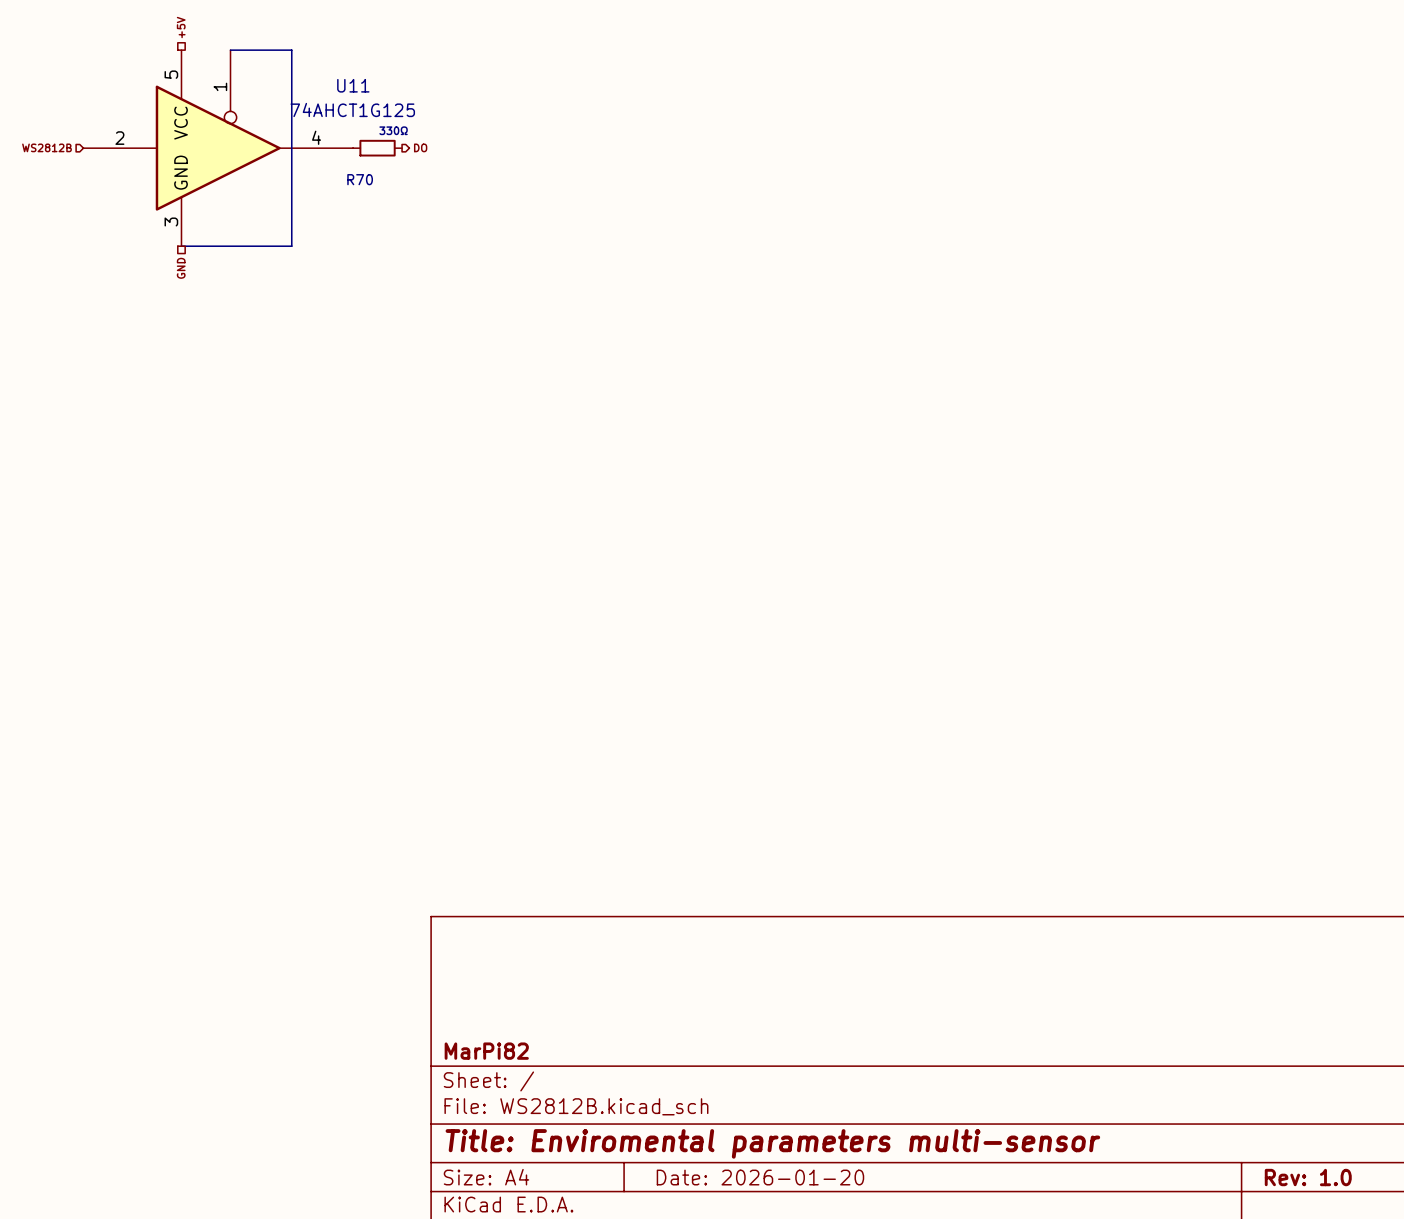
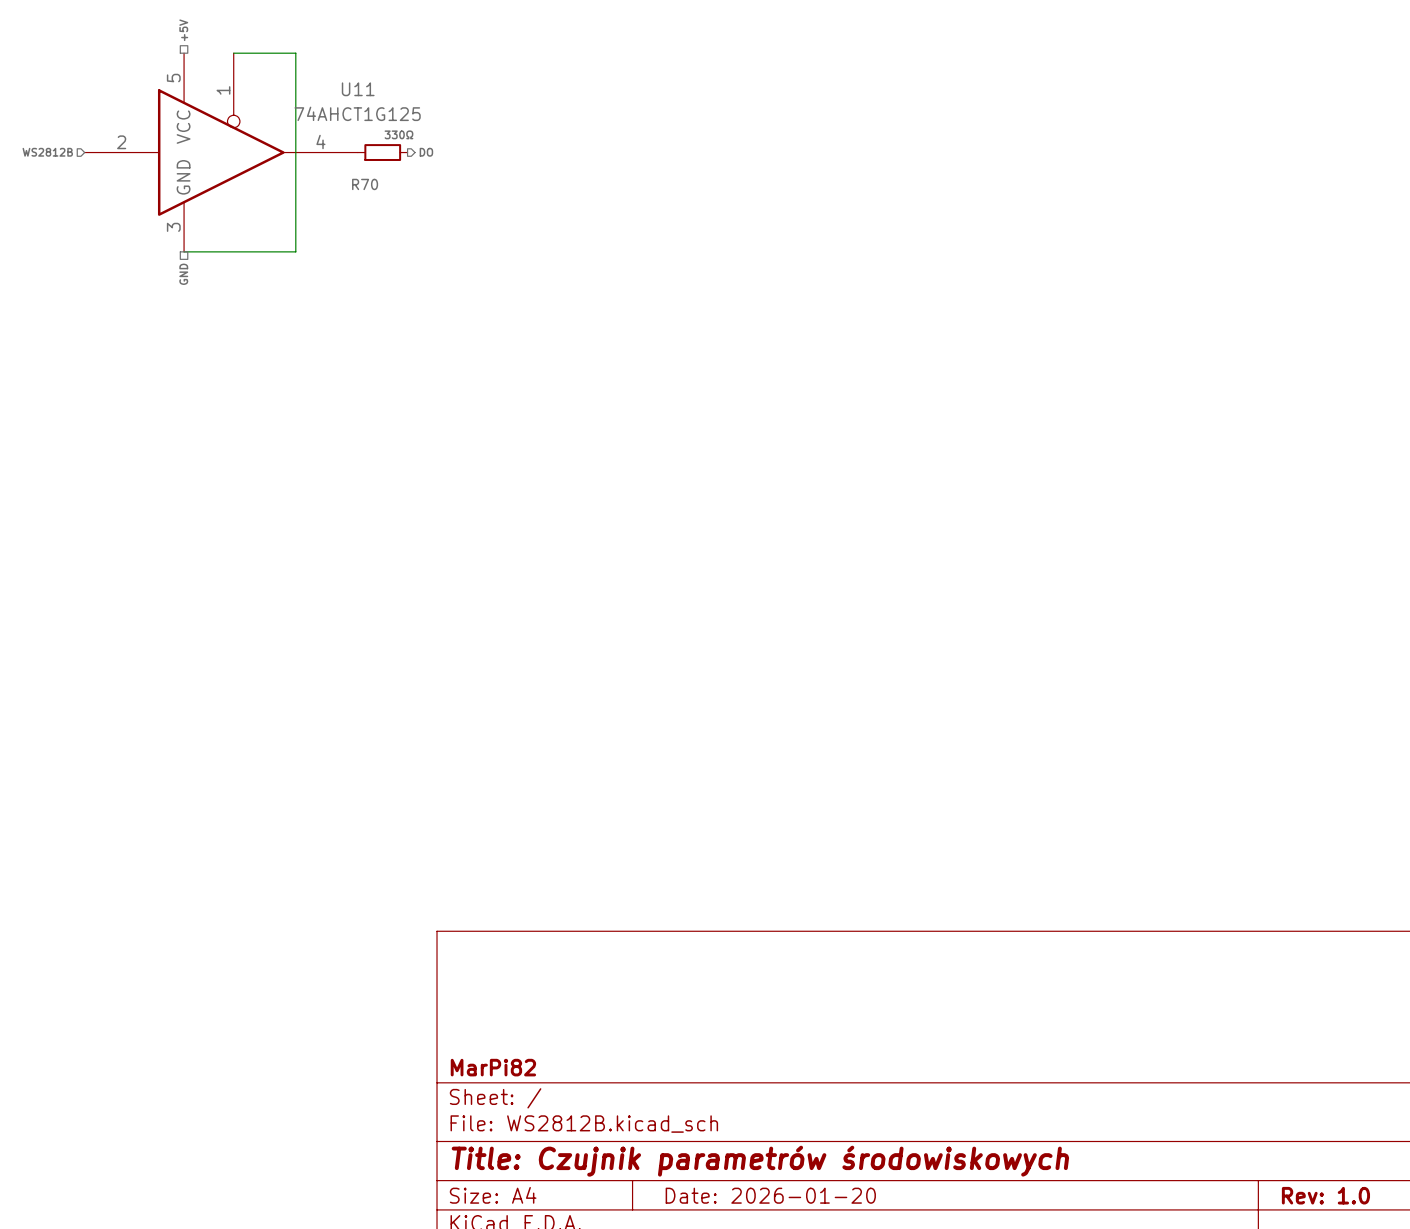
title block: Title: Enviromental parameters multi-sensor (772, 1143) -> Title: Czujnik parametrów środowiskowych (760, 1161)

